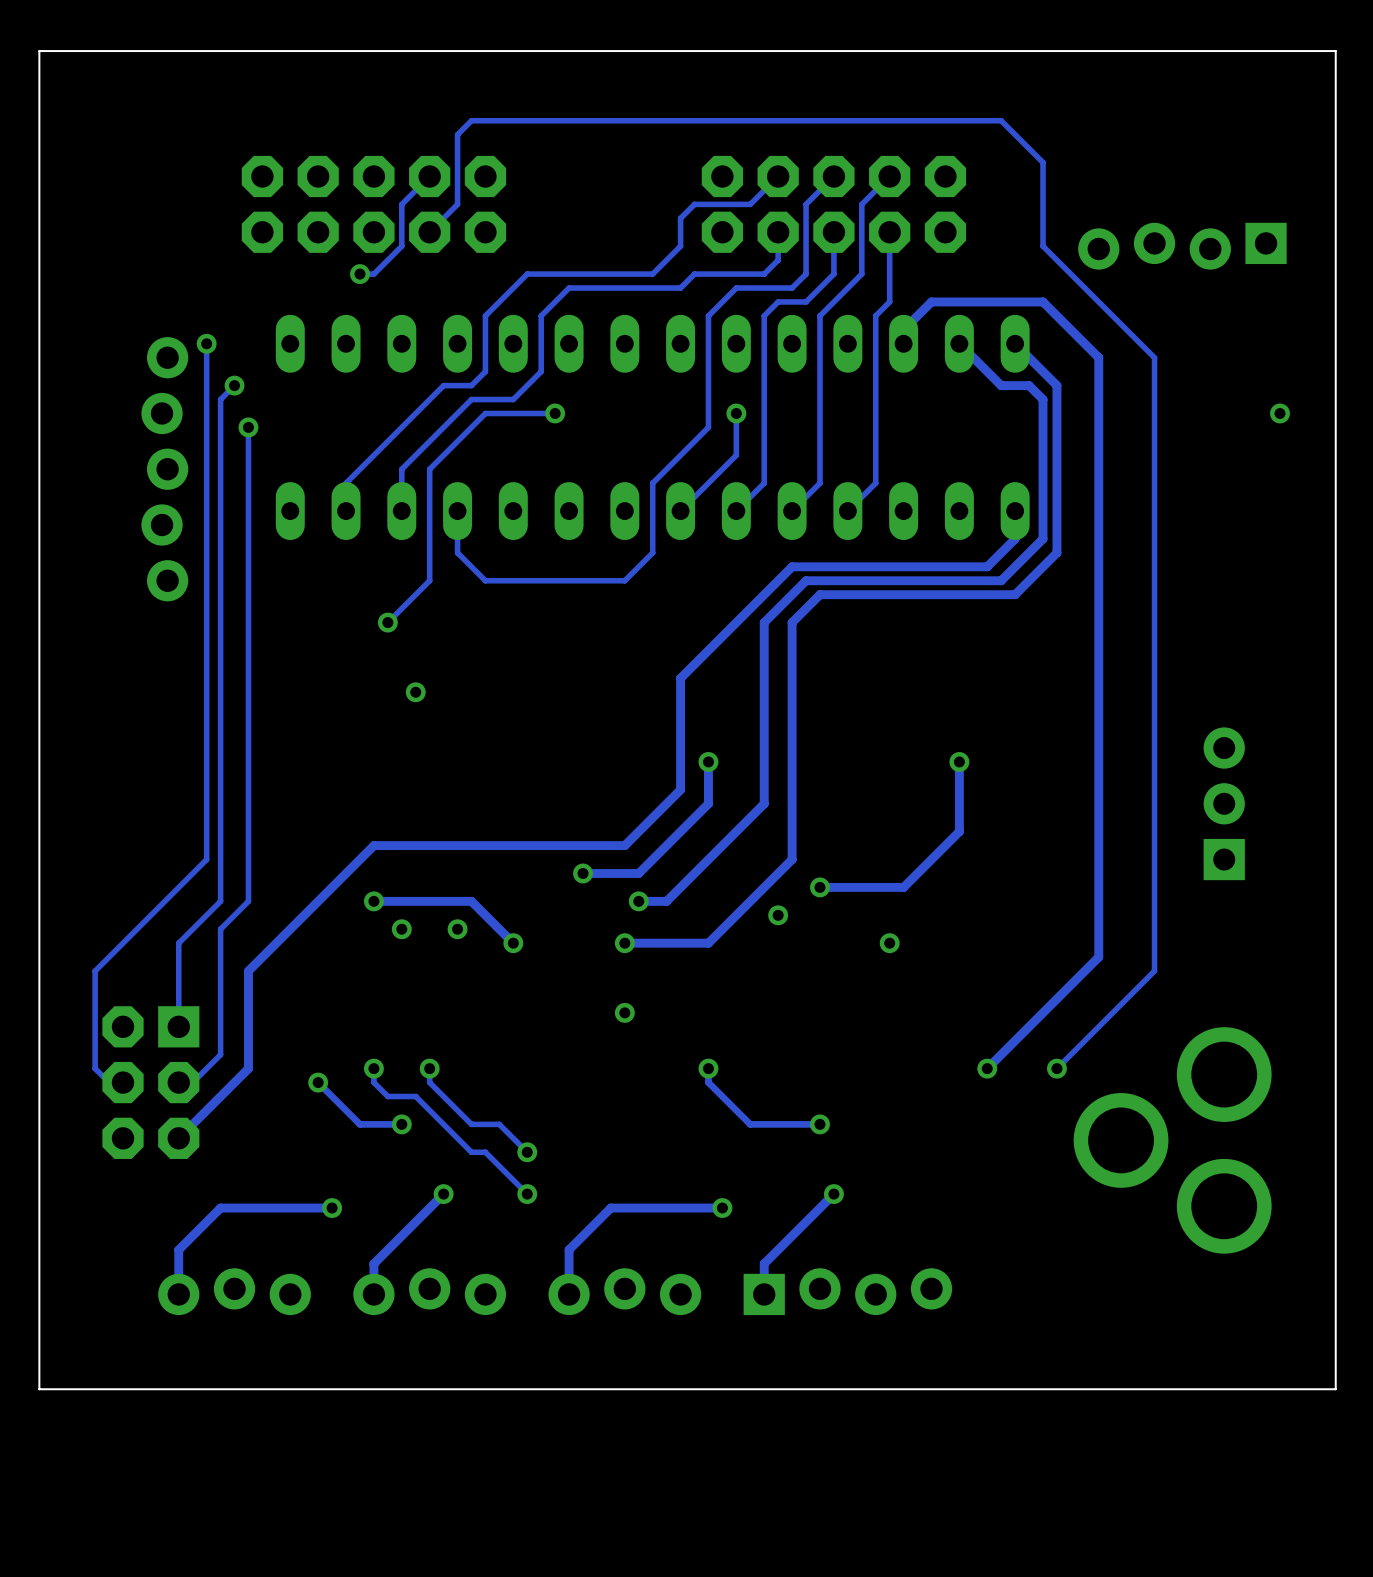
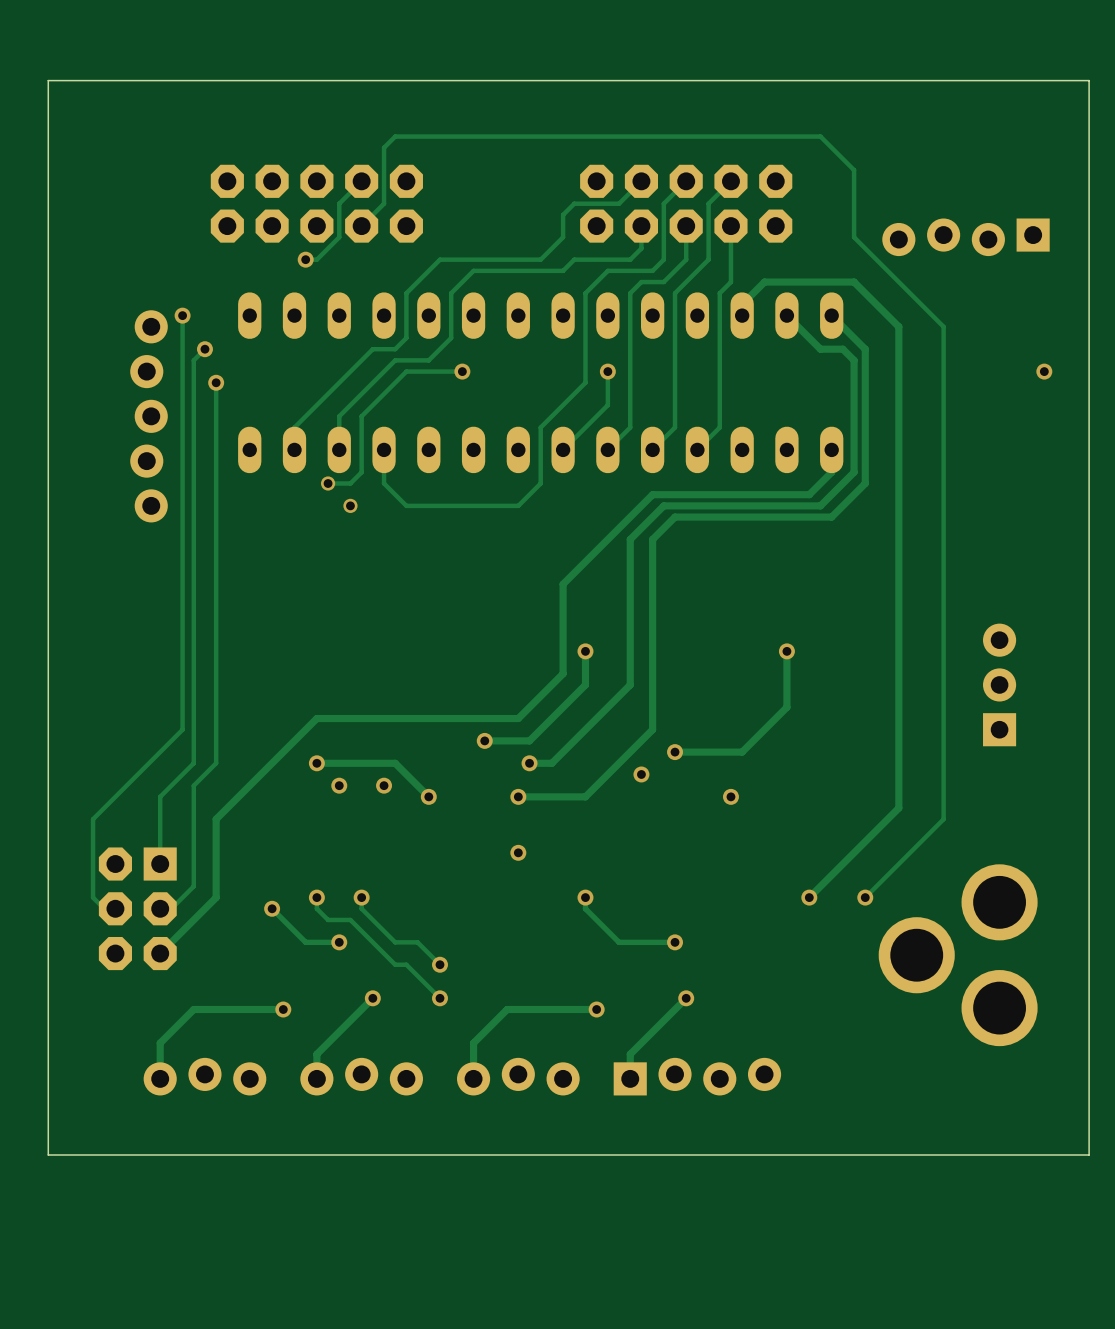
track: (429, 538) (429, 580) (387, 622) -> (361, 472) (350, 483) (328, 483)
via: none -> (328, 483)
via: none -> (350, 505)
via: (387, 622) -> none
via: (415, 692) -> none

